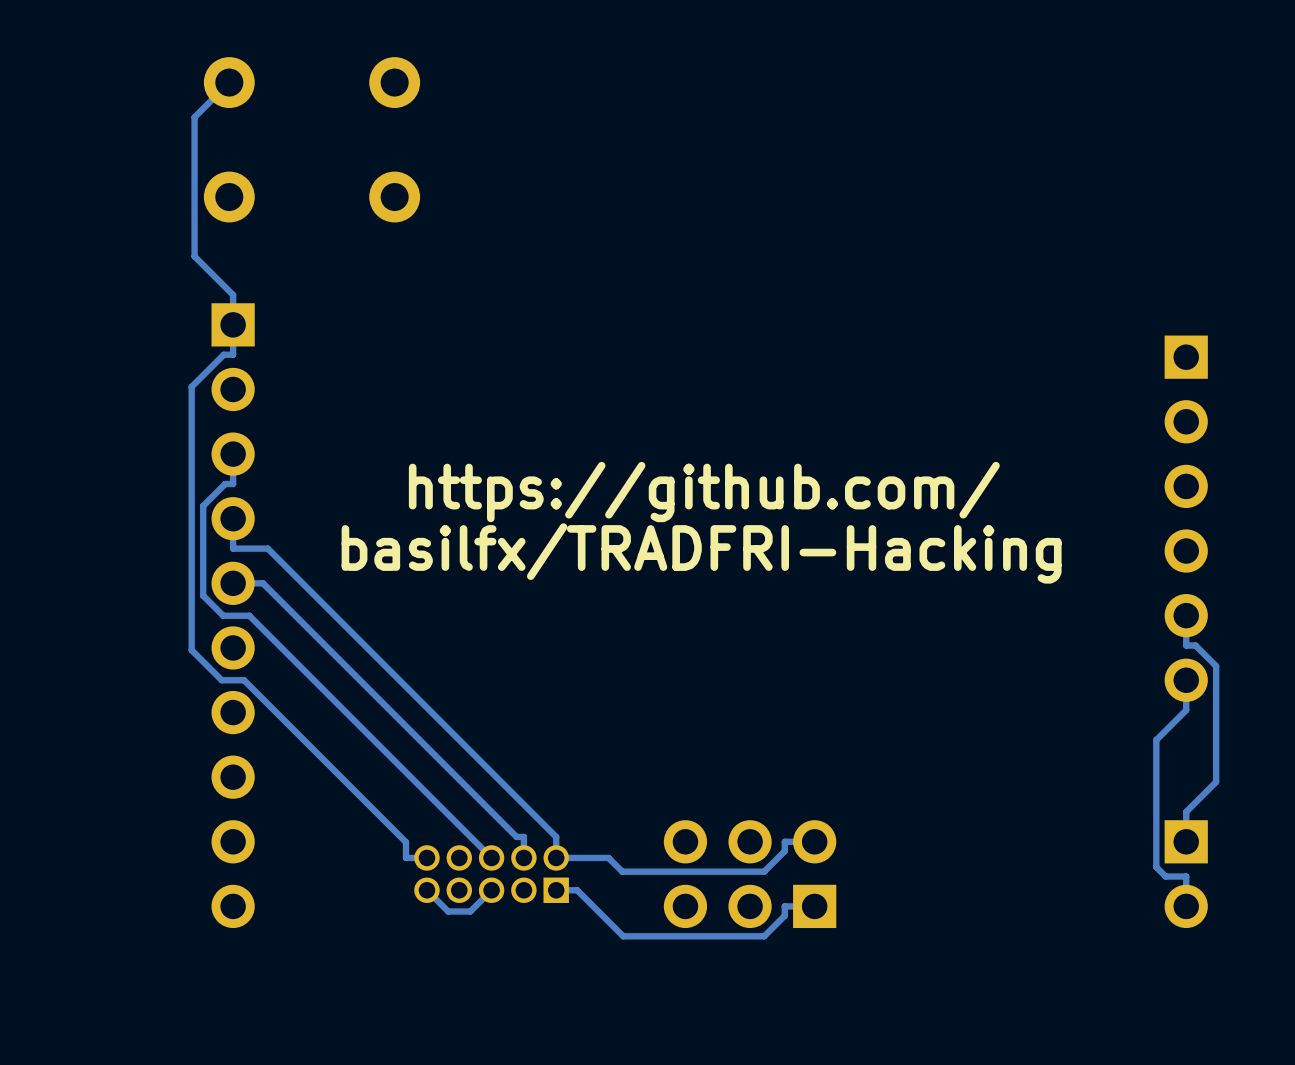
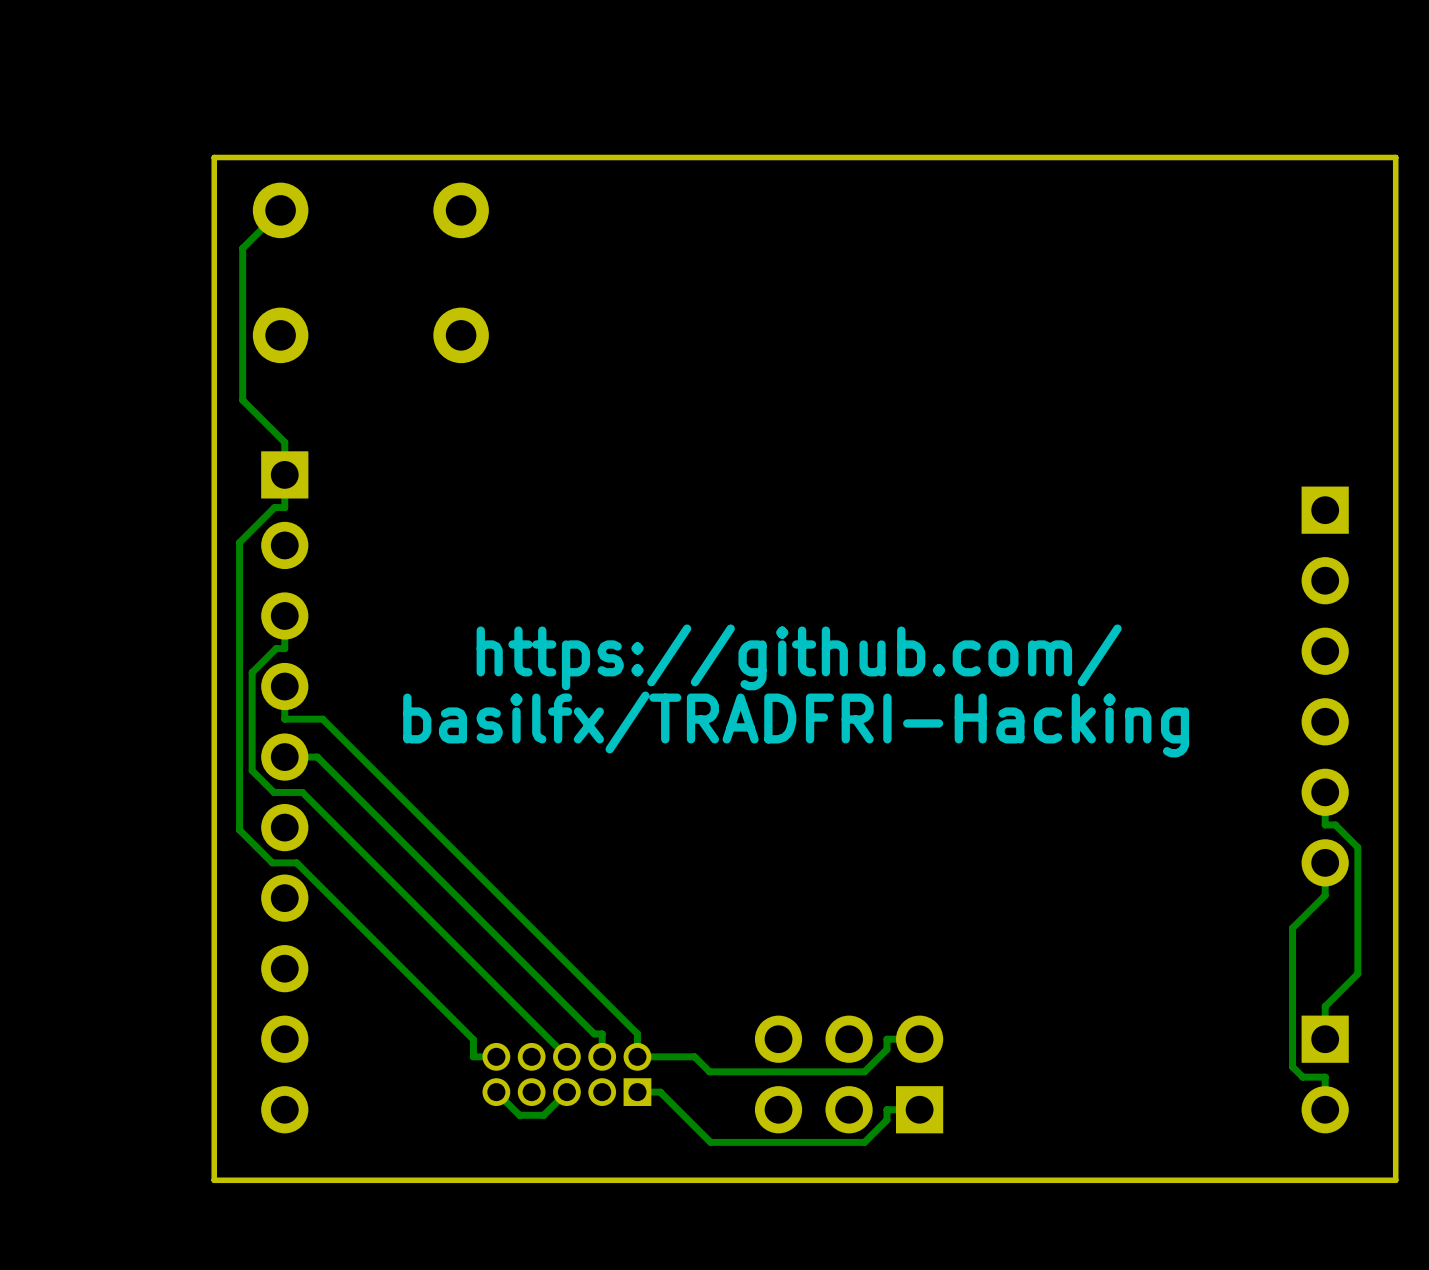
board edge: none -> (1395, 157) (214, 157) (214, 1180) (1395, 1180) (1395, 157)

